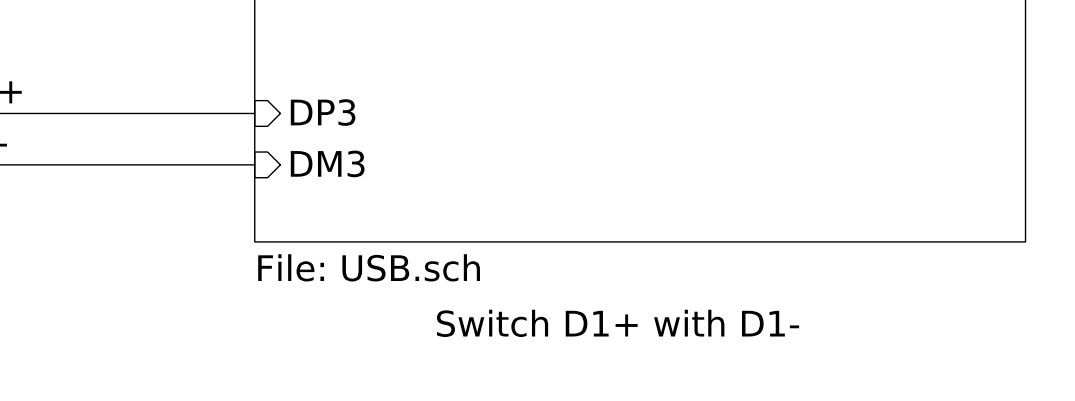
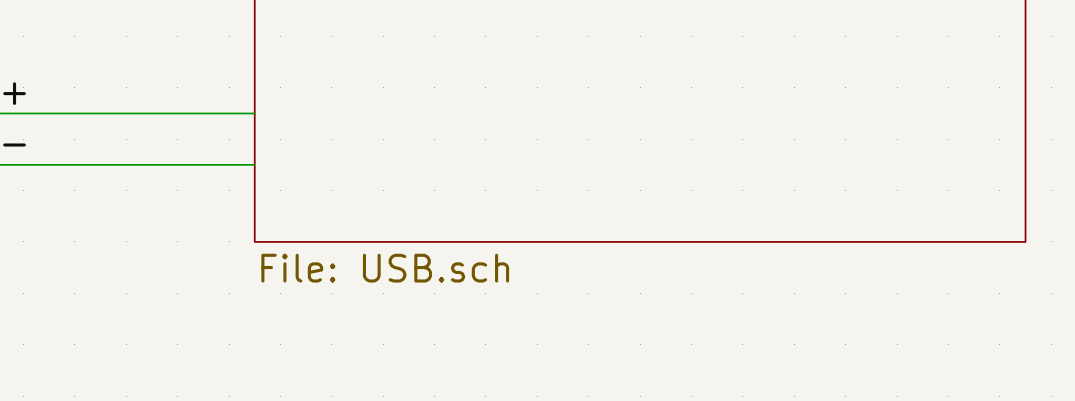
sheet pin: DP3 (323, 112) -> none
sheet pin: DM3 (327, 163) -> none
text: Switch D1+ with D1- (618, 323) -> none

